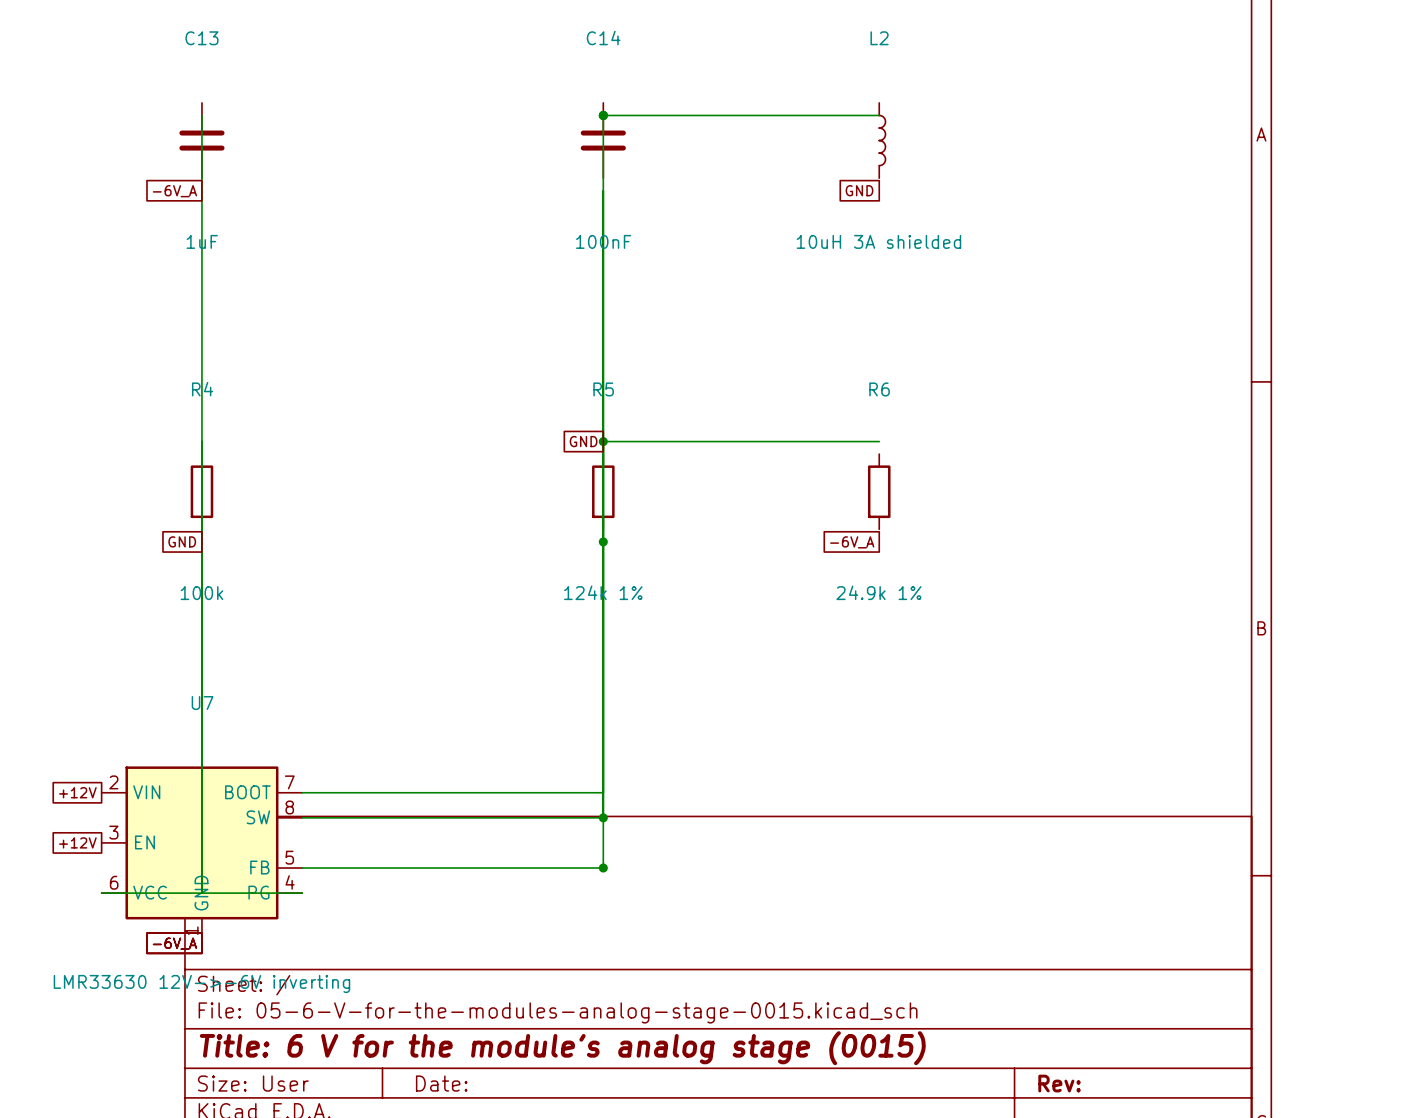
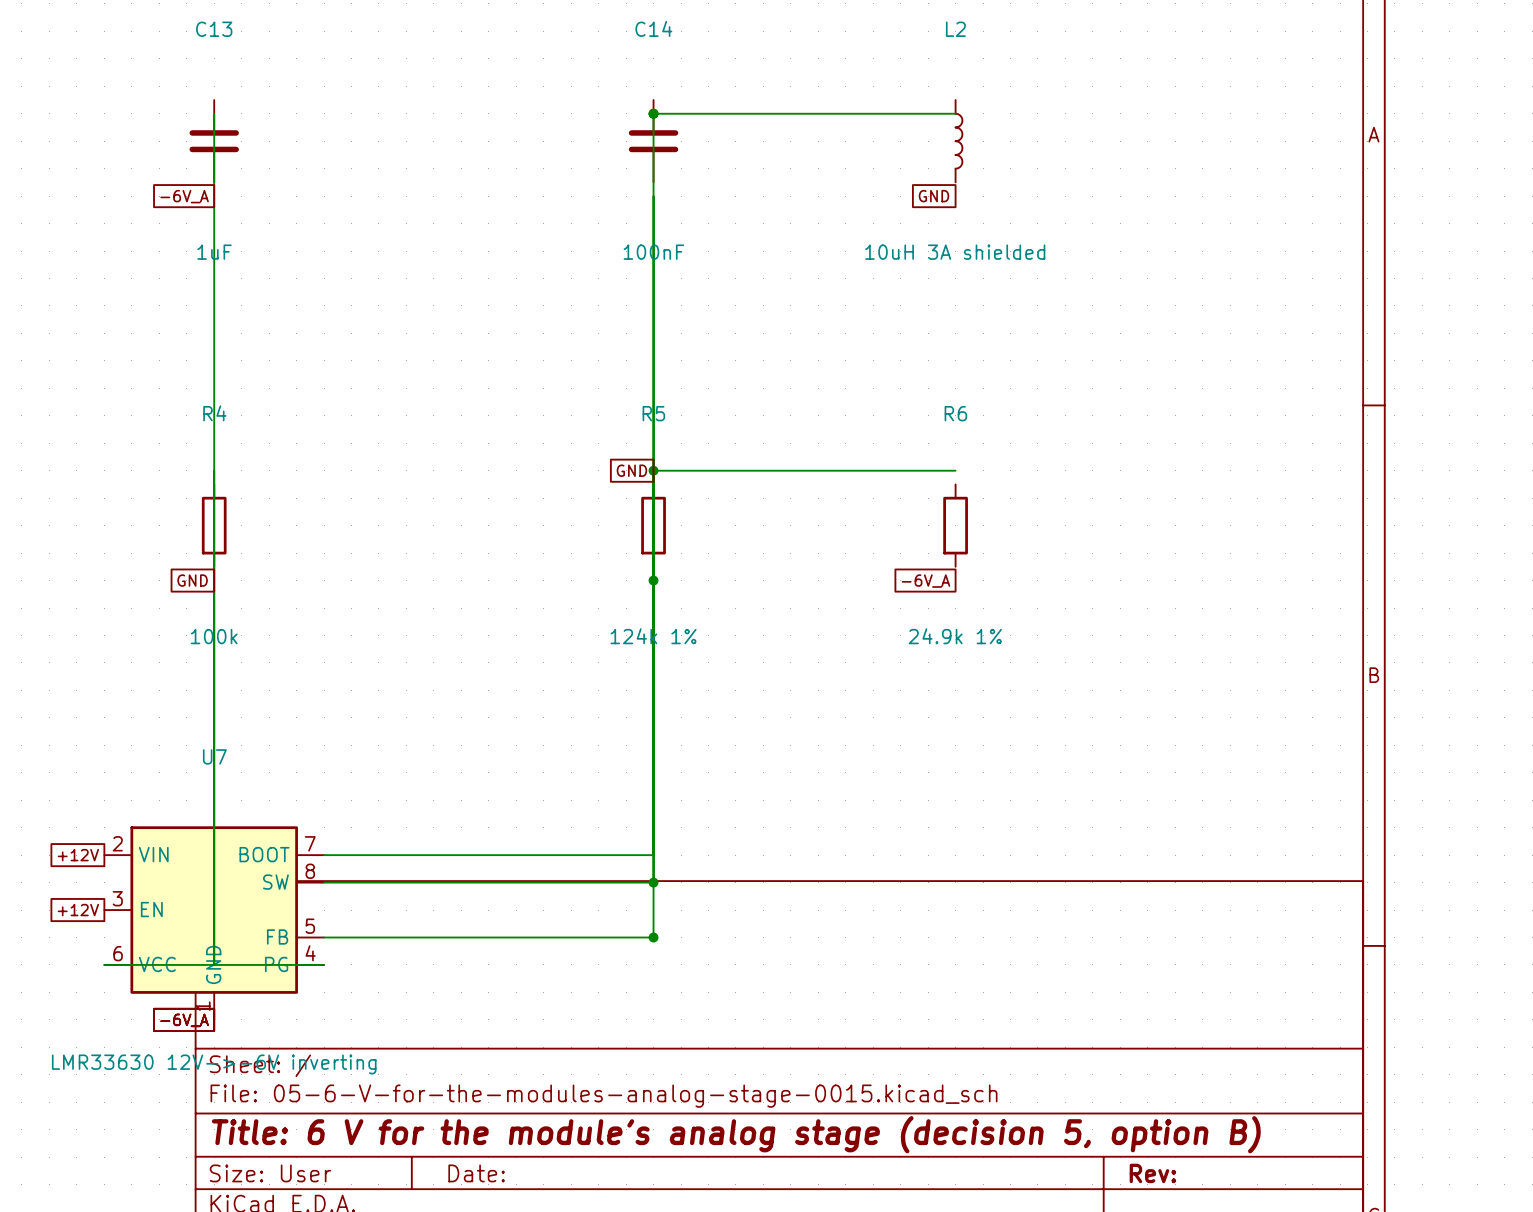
title block: Title: 6 V for the module's analog stage (0015) (562, 1048) -> Title: 6 V for the module's analog stage (decision 5, option B) (736, 1134)

